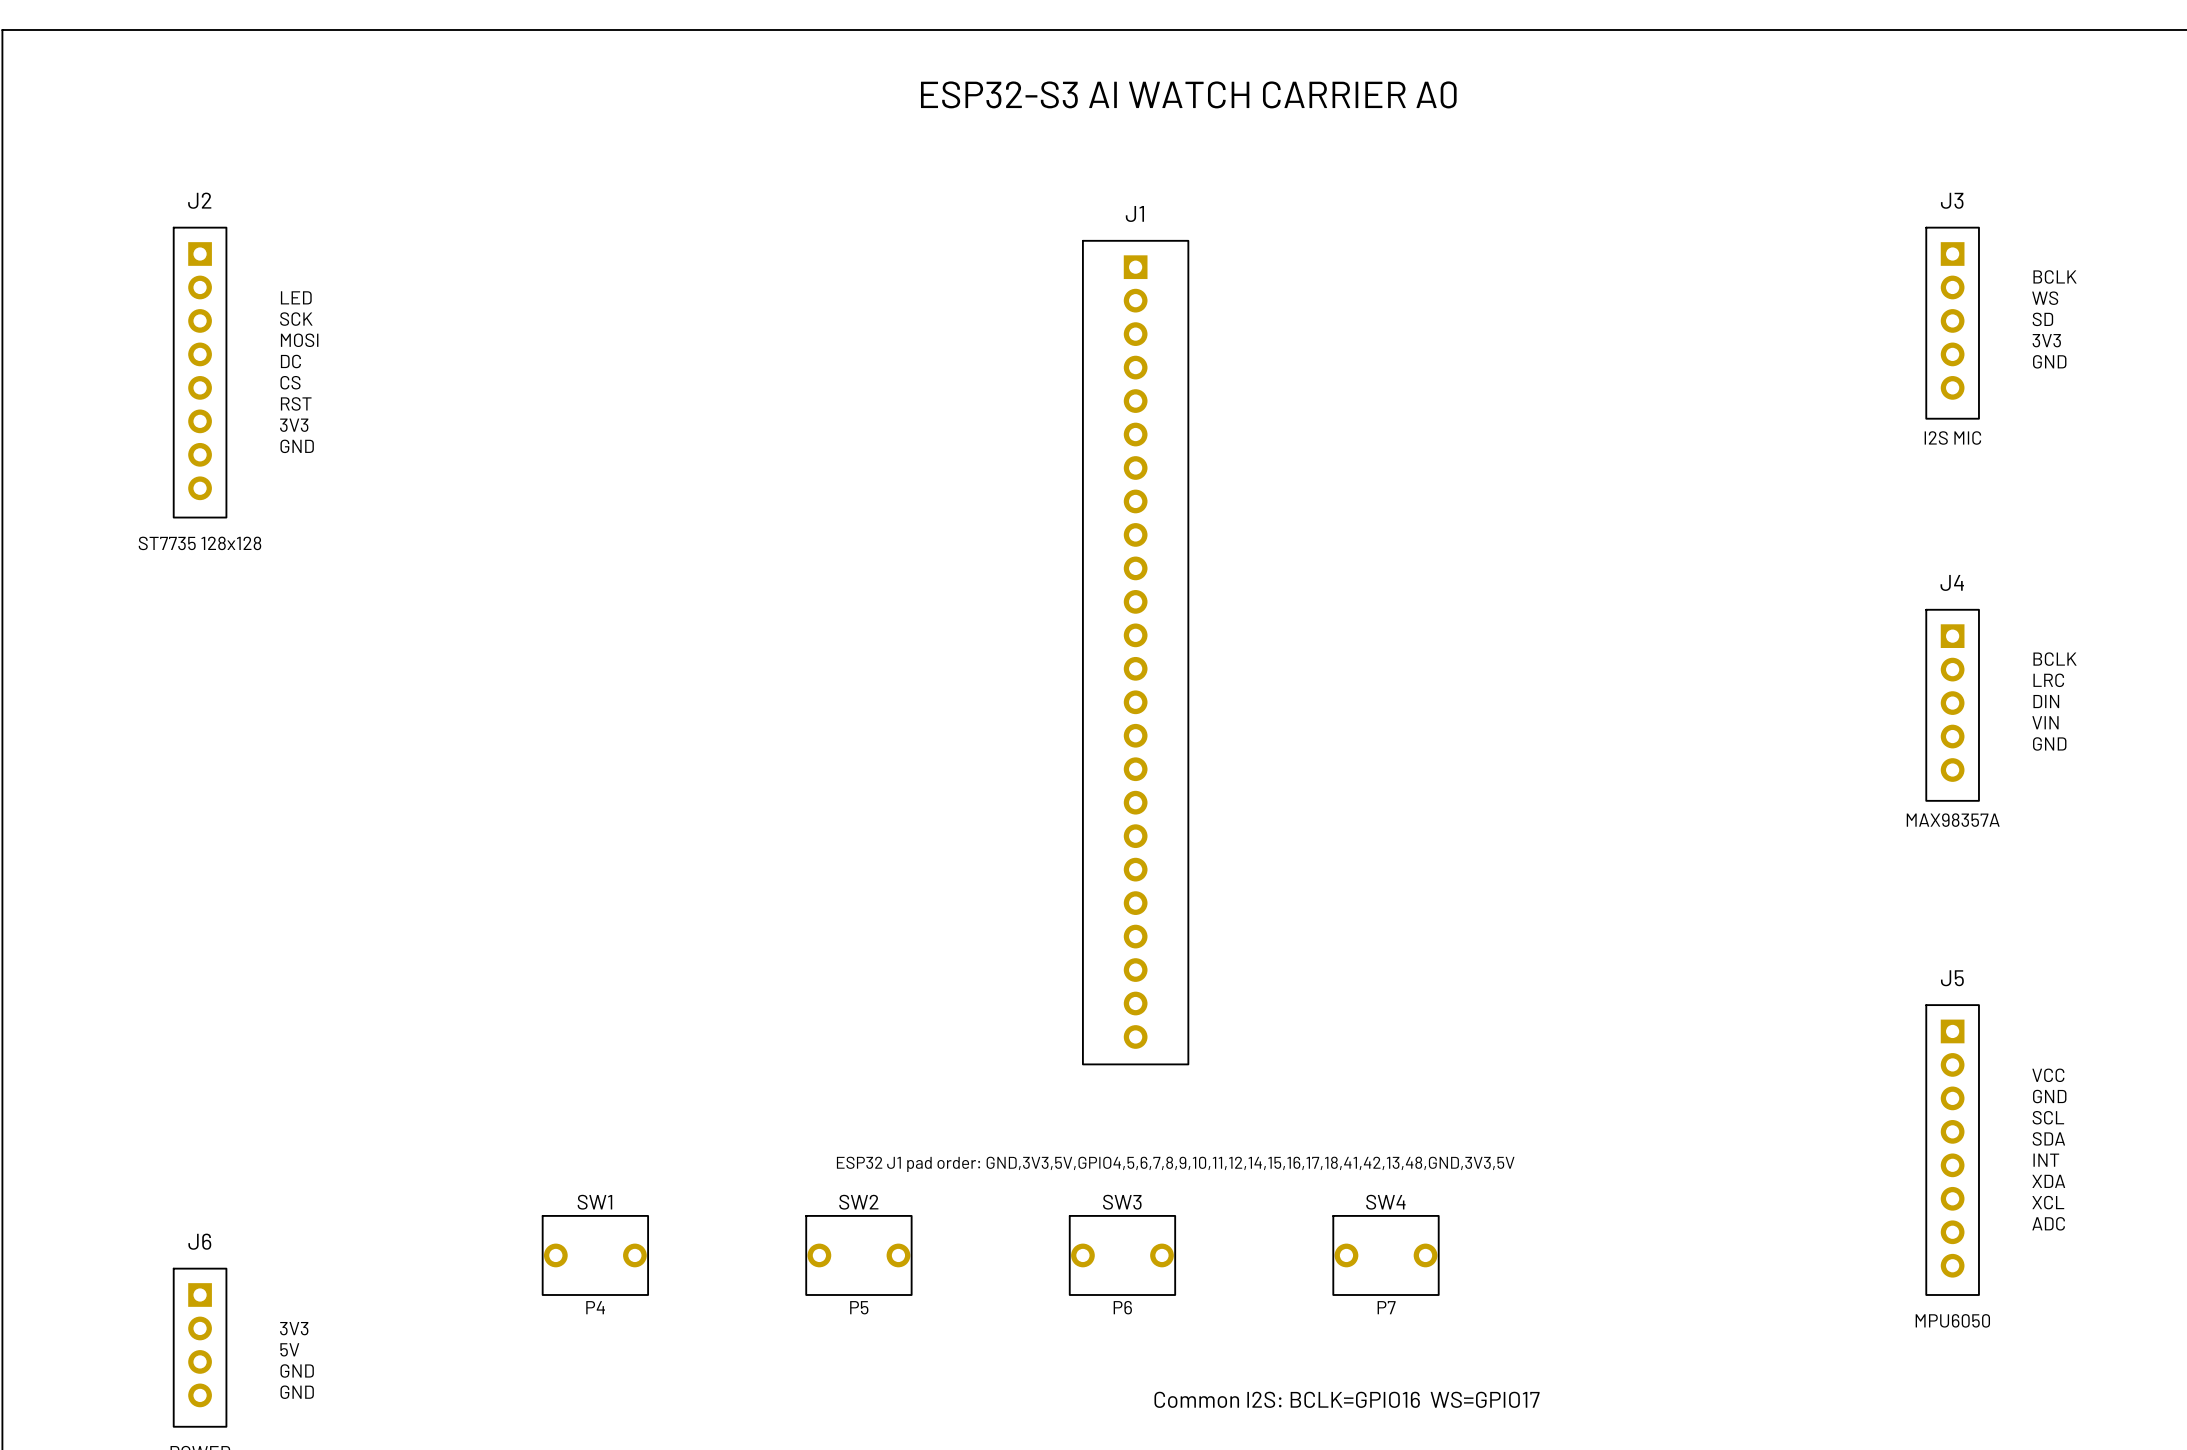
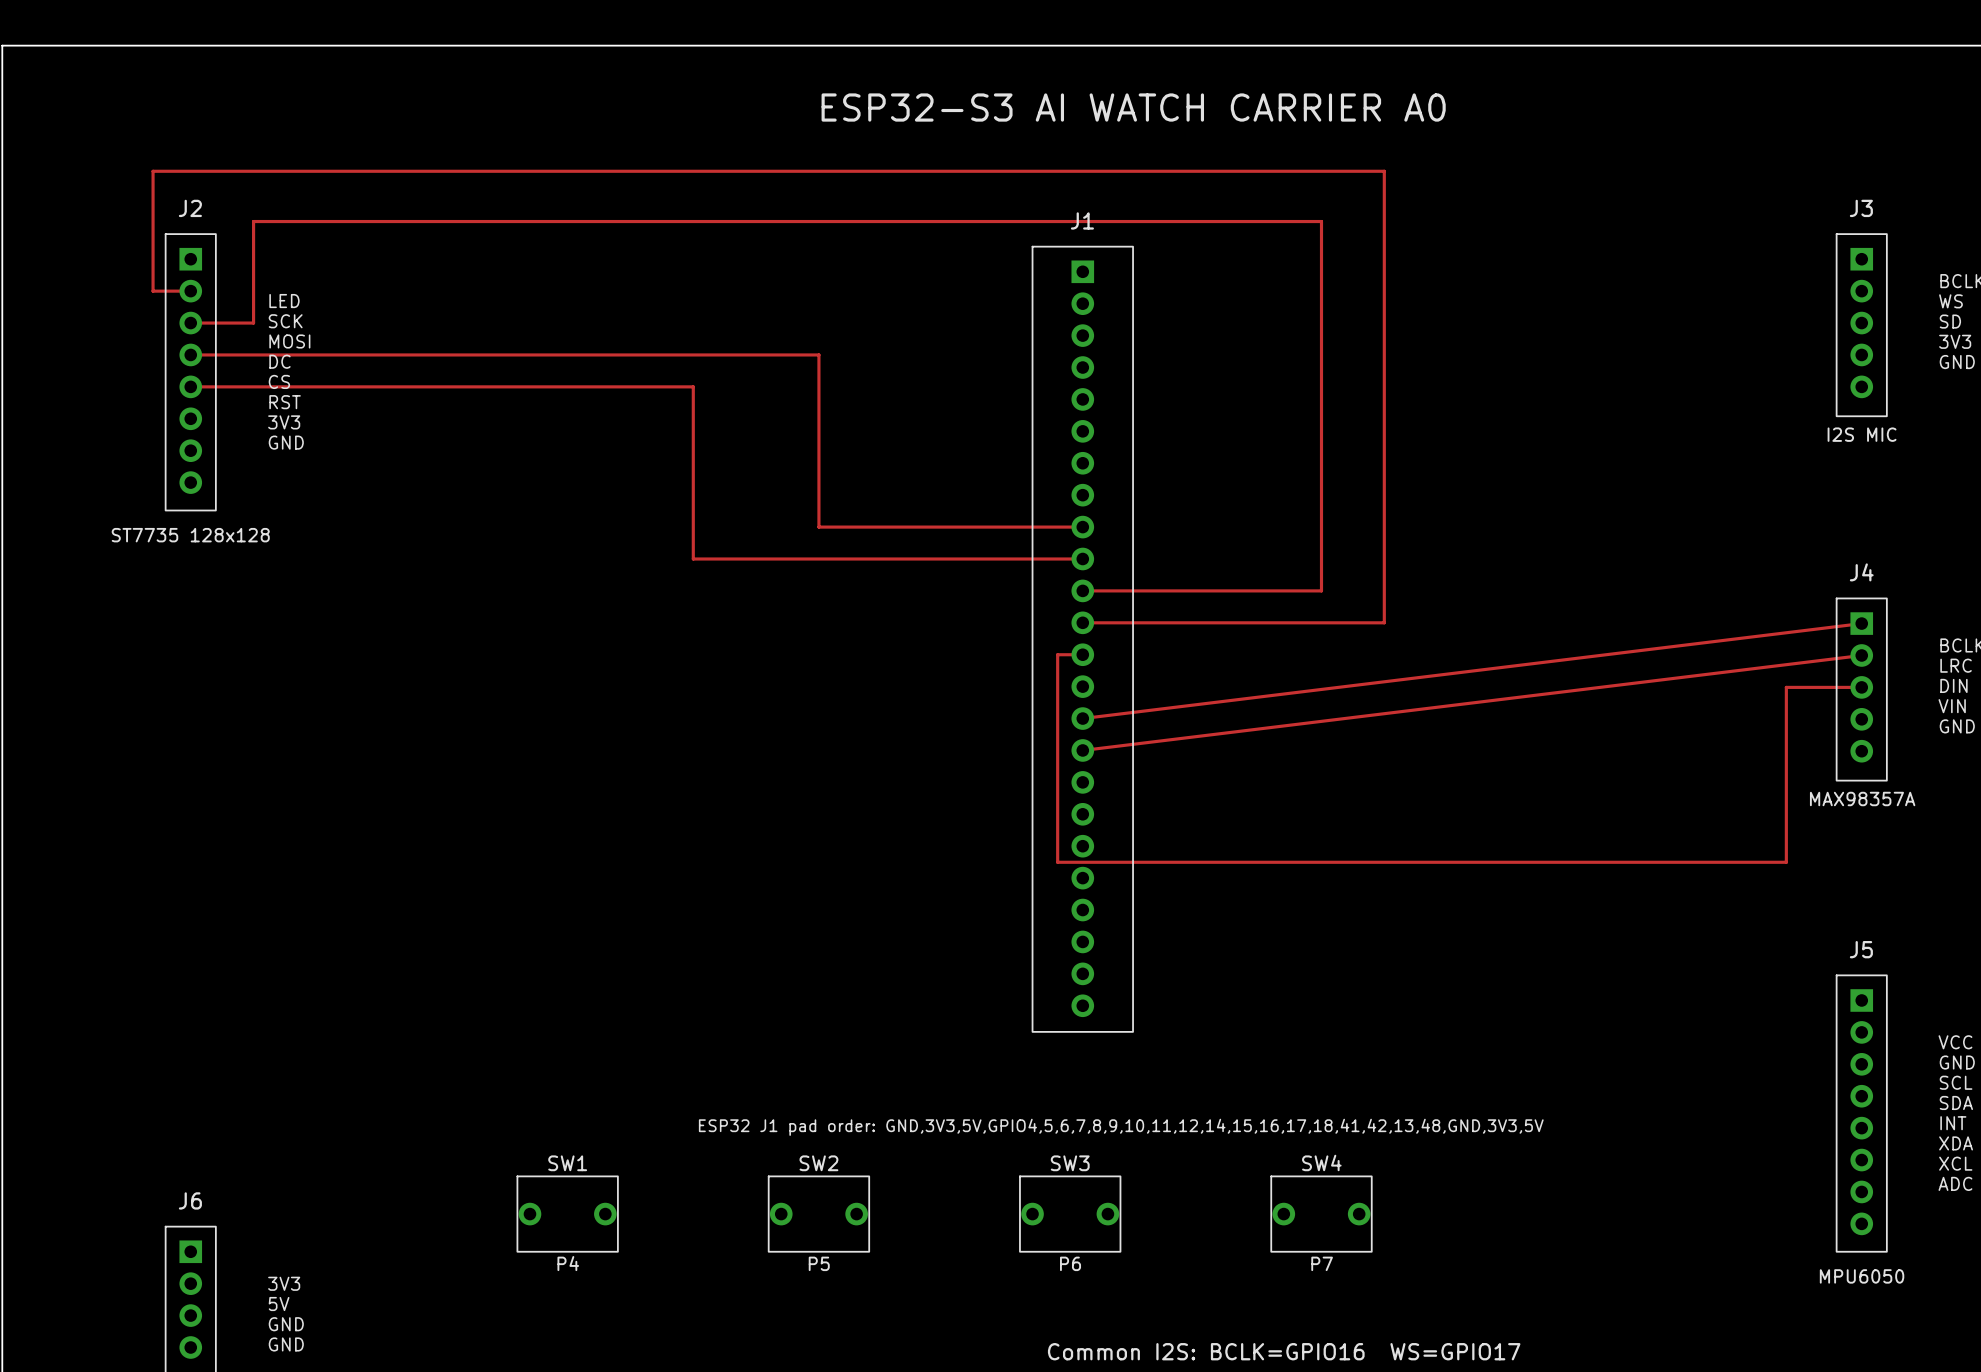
track: none -> (190, 291) (153, 291) (153, 171) (1384, 171) (1384, 622) (1082, 622)
track: none -> (190, 323) (253, 323) (253, 221) (1321, 221) (1321, 590) (1082, 590)
track: none -> (190, 354) (818, 354) (818, 527) (1082, 527)
track: none -> (190, 386) (693, 386) (693, 558) (1082, 558)
track: none -> (1861, 623) (1082, 718)
track: none -> (1082, 654) (1057, 654) (1057, 862) (1786, 862) (1786, 687) (1861, 687)
track: none -> (1861, 655) (1082, 750)

